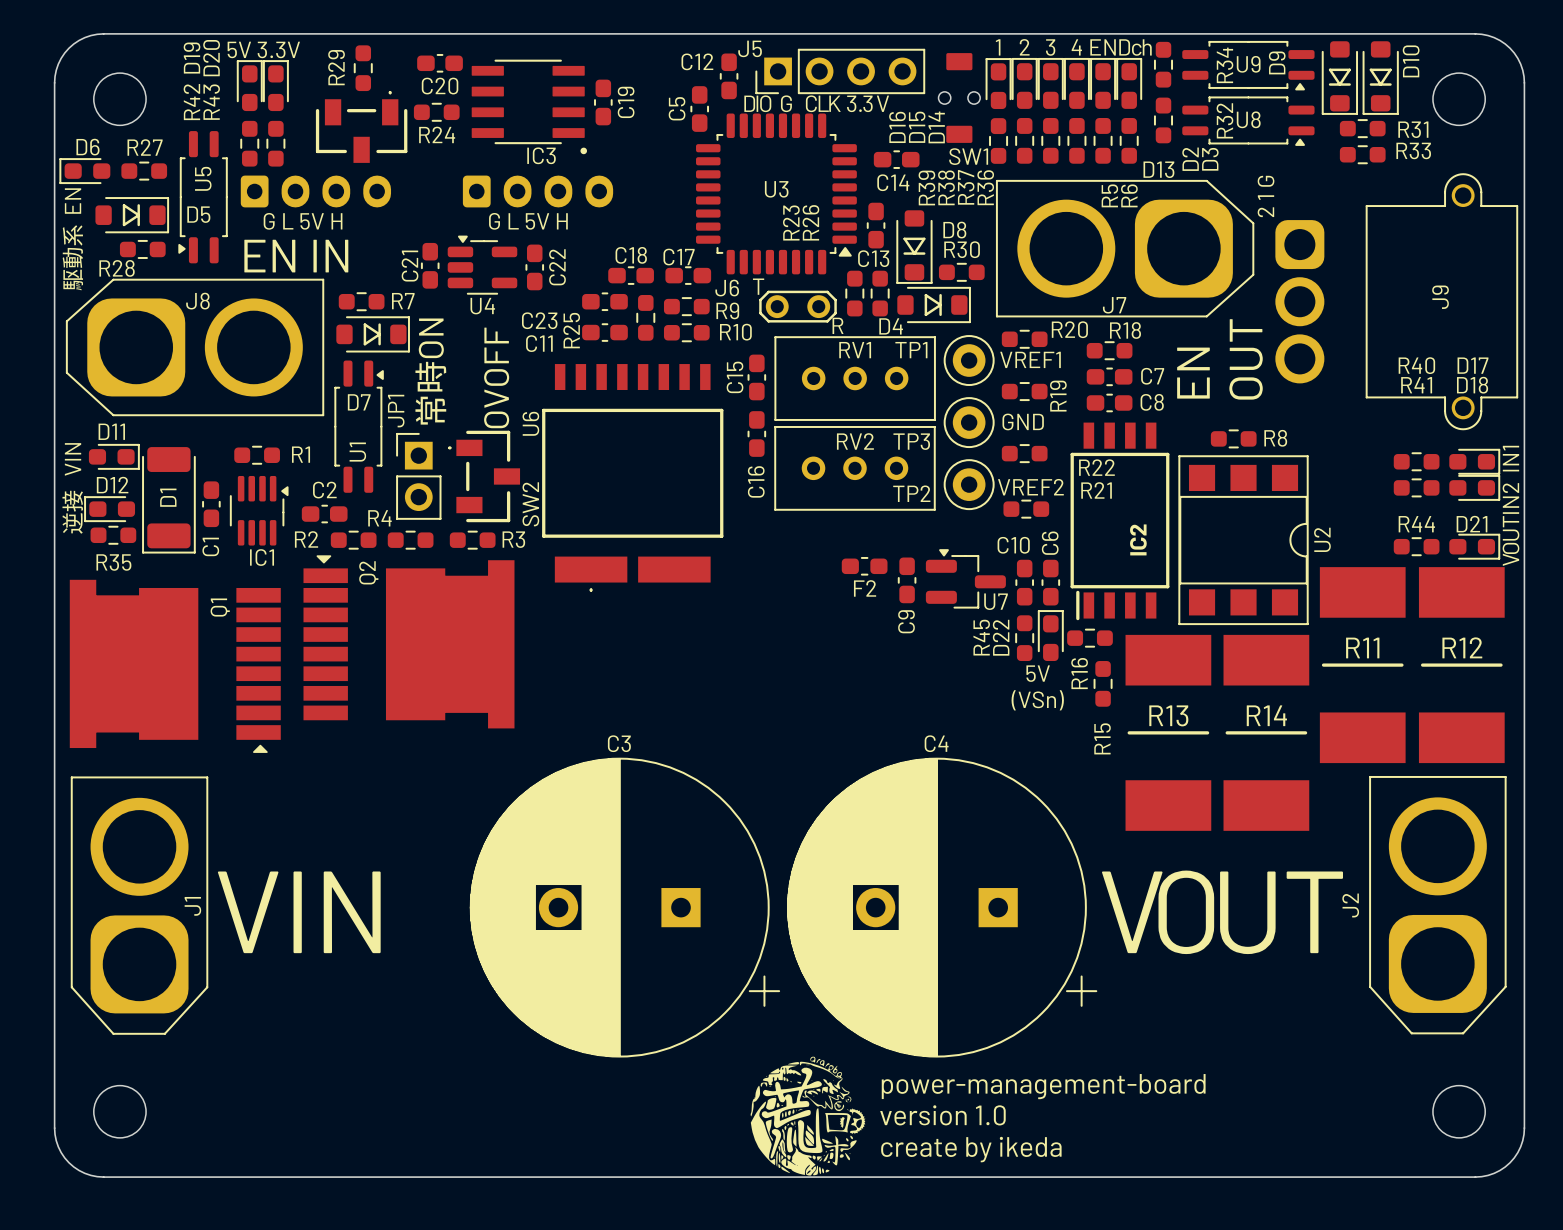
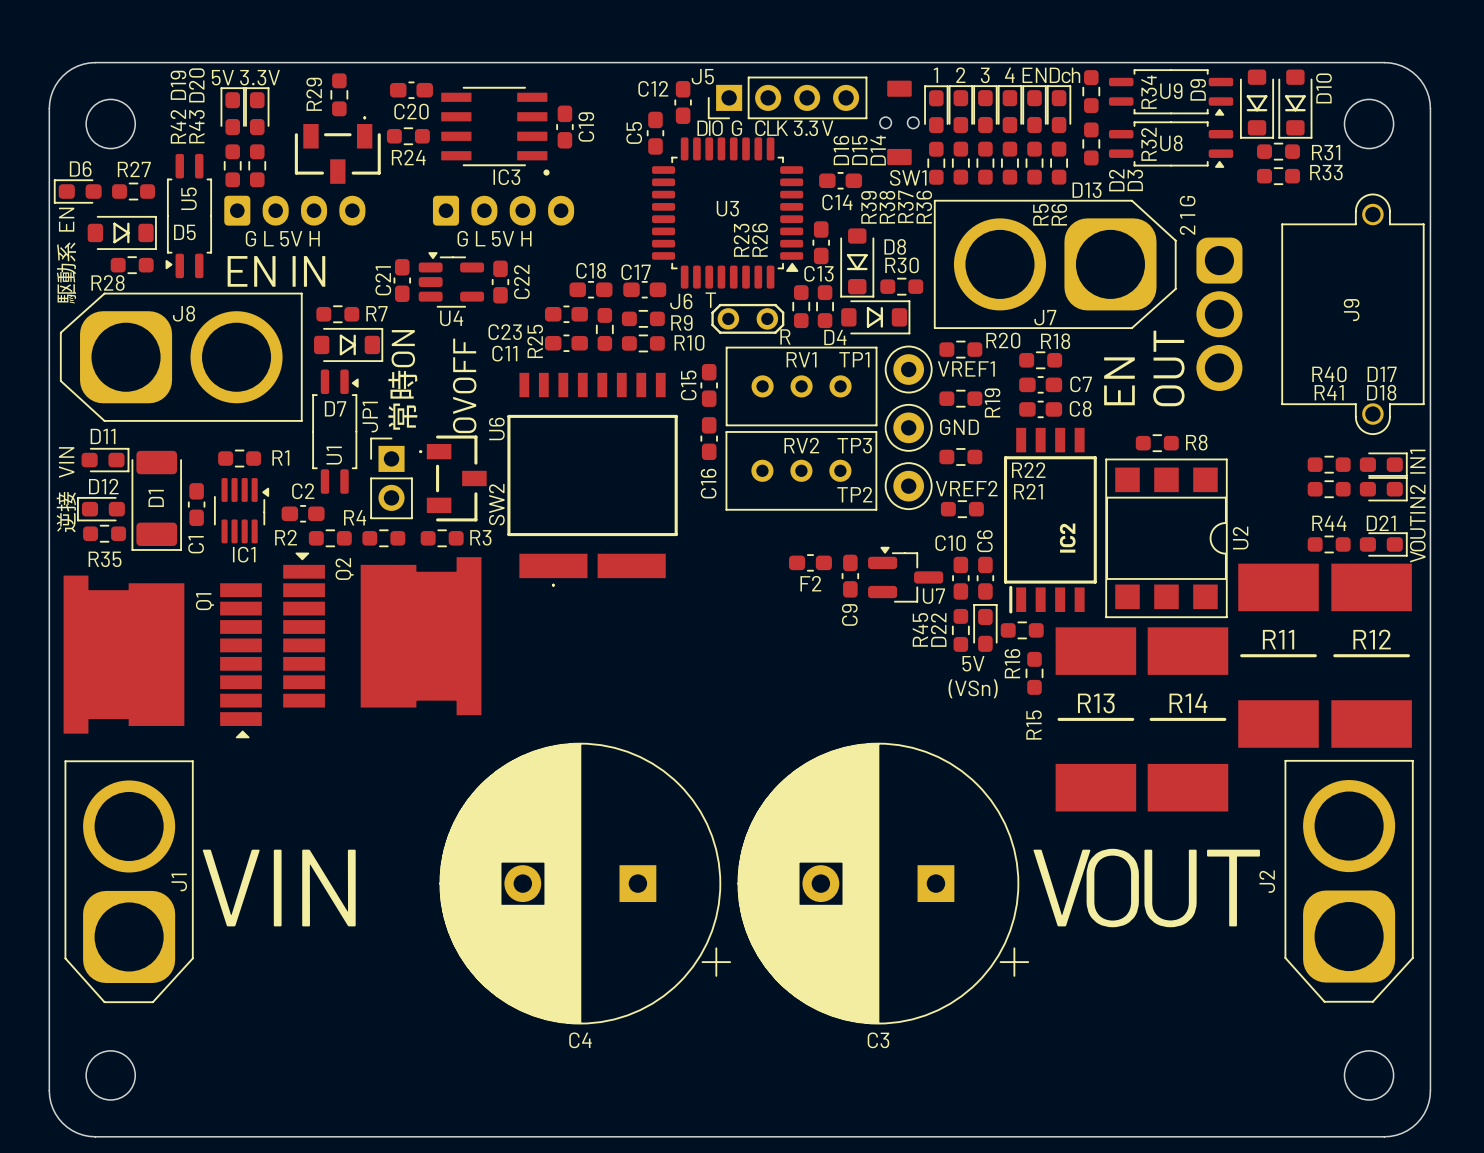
C3 name: C3 (619, 743) -> C4 (580, 1040)
C4 name: C4 (936, 743) -> C3 (878, 1040)
drawing: [750, 1056, 866, 1176] -> none
text: power-management-board (1043, 1086) -> none
text: version 1.0 (942, 1115) -> none
text: create by ikeda (971, 1149) -> none

